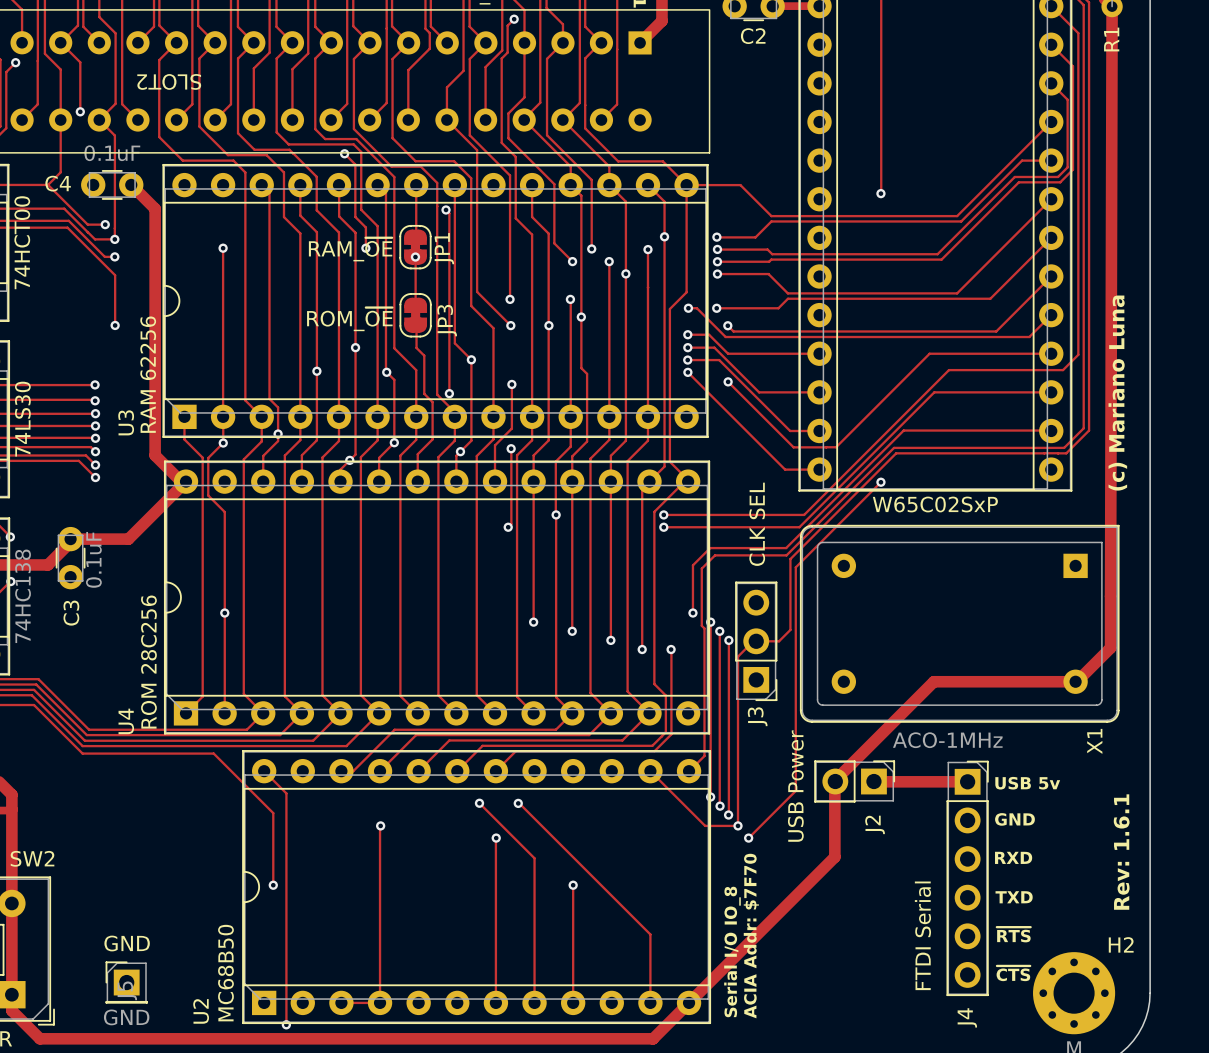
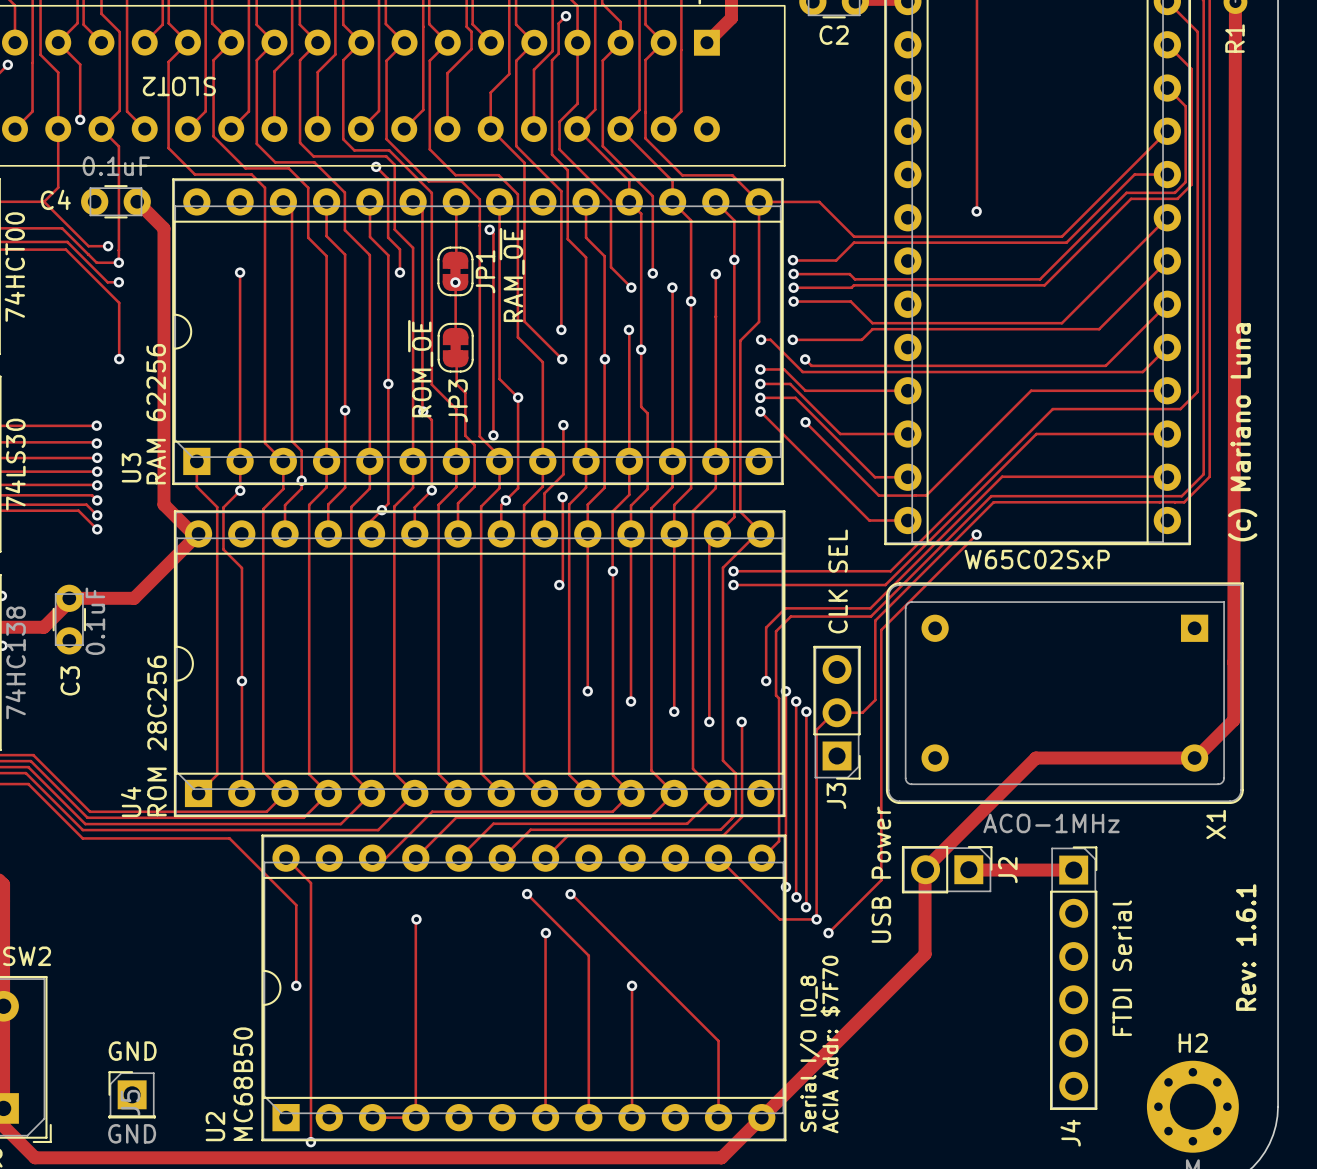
JP1 value rotation: 0° (350, 249) -> 90° counterclockwise (512, 275)
JP3 value rotation: 0° (349, 319) -> 90° counterclockwise (420, 368)
JP3 name position: JP3 (447, 320) -> JP3 (458, 400)
text: USB 5v (1027, 783) -> none
text: GND (1014, 819) -> none
J2 name position: J2 (875, 824) -> J2 (1007, 870)
text: RXD (1013, 857) -> none
text: TXD (1014, 897) -> none
text: ~{RTS} (1013, 934) -> none
J4 value position: FTDI Serial (922, 935) -> FTDI Serial (1122, 968)
H2 name position: H2 (1121, 944) -> H2 (1193, 1043)
text: ~{CTS} (1013, 973) -> none

